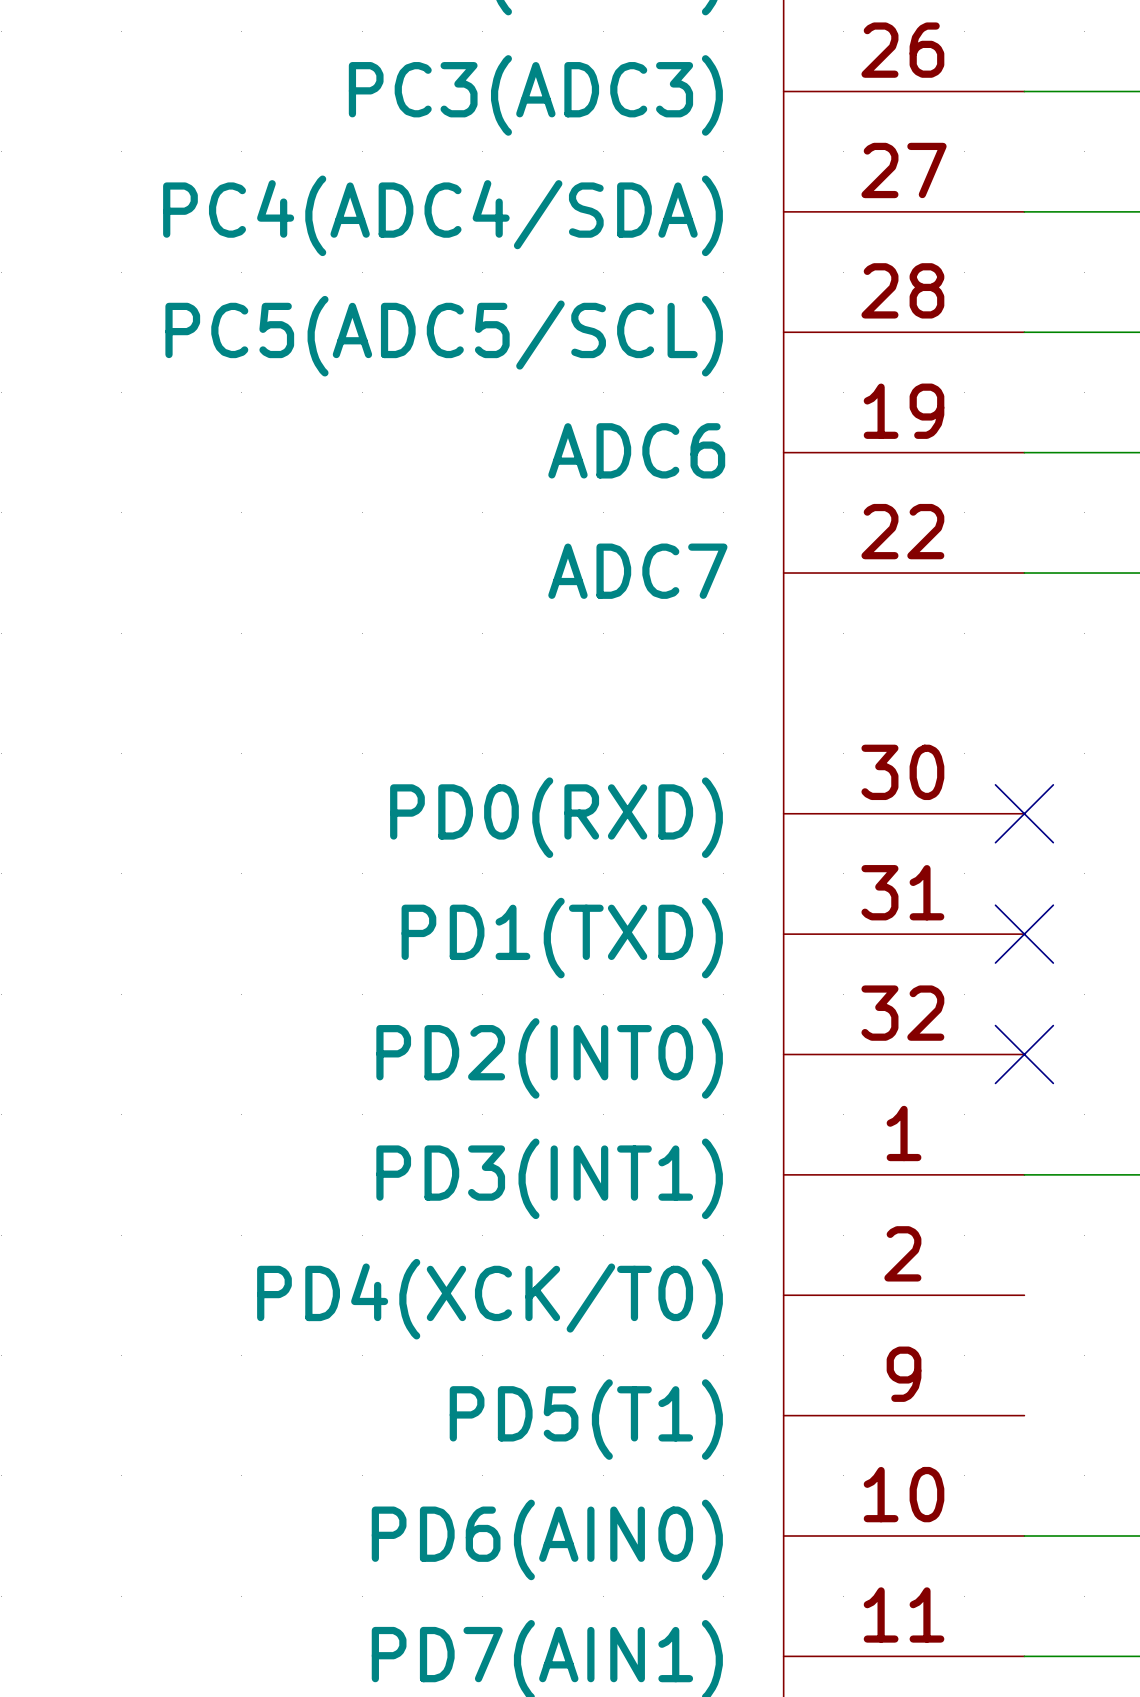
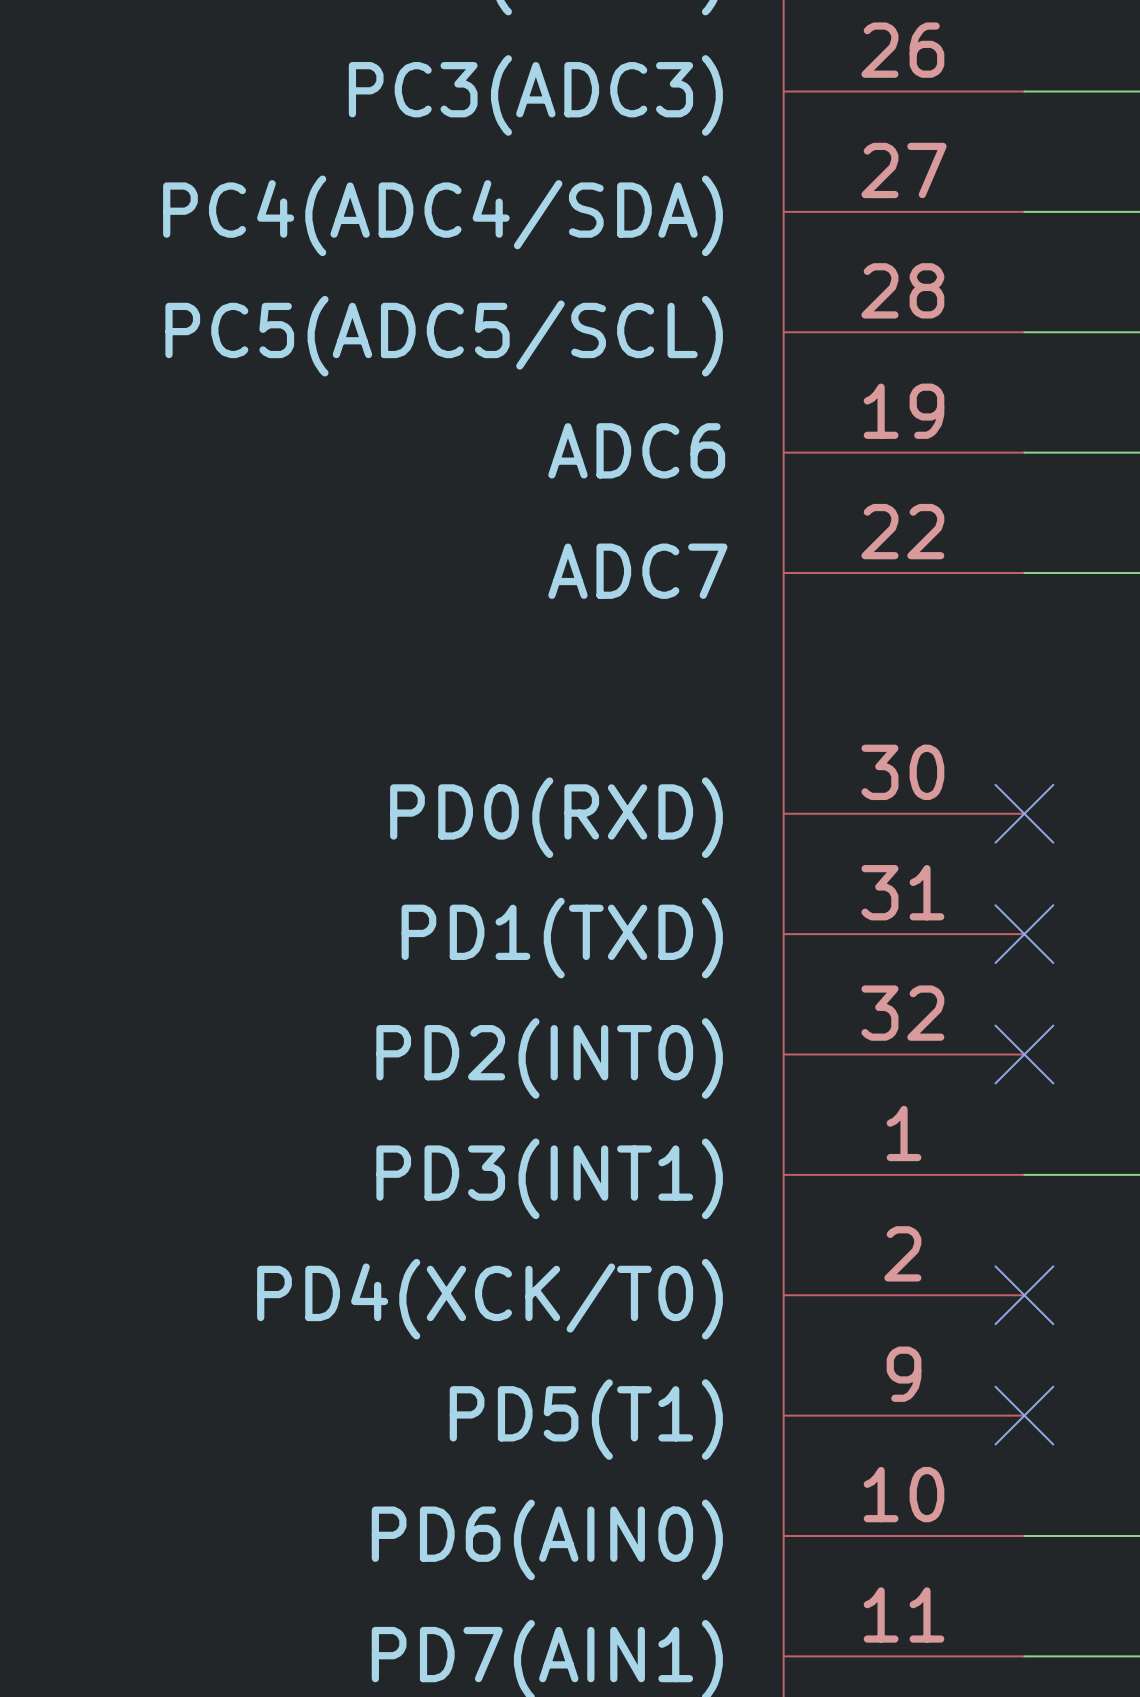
no-connect mark: none -> (1024, 1295)
no-connect mark: none -> (1024, 1415)

